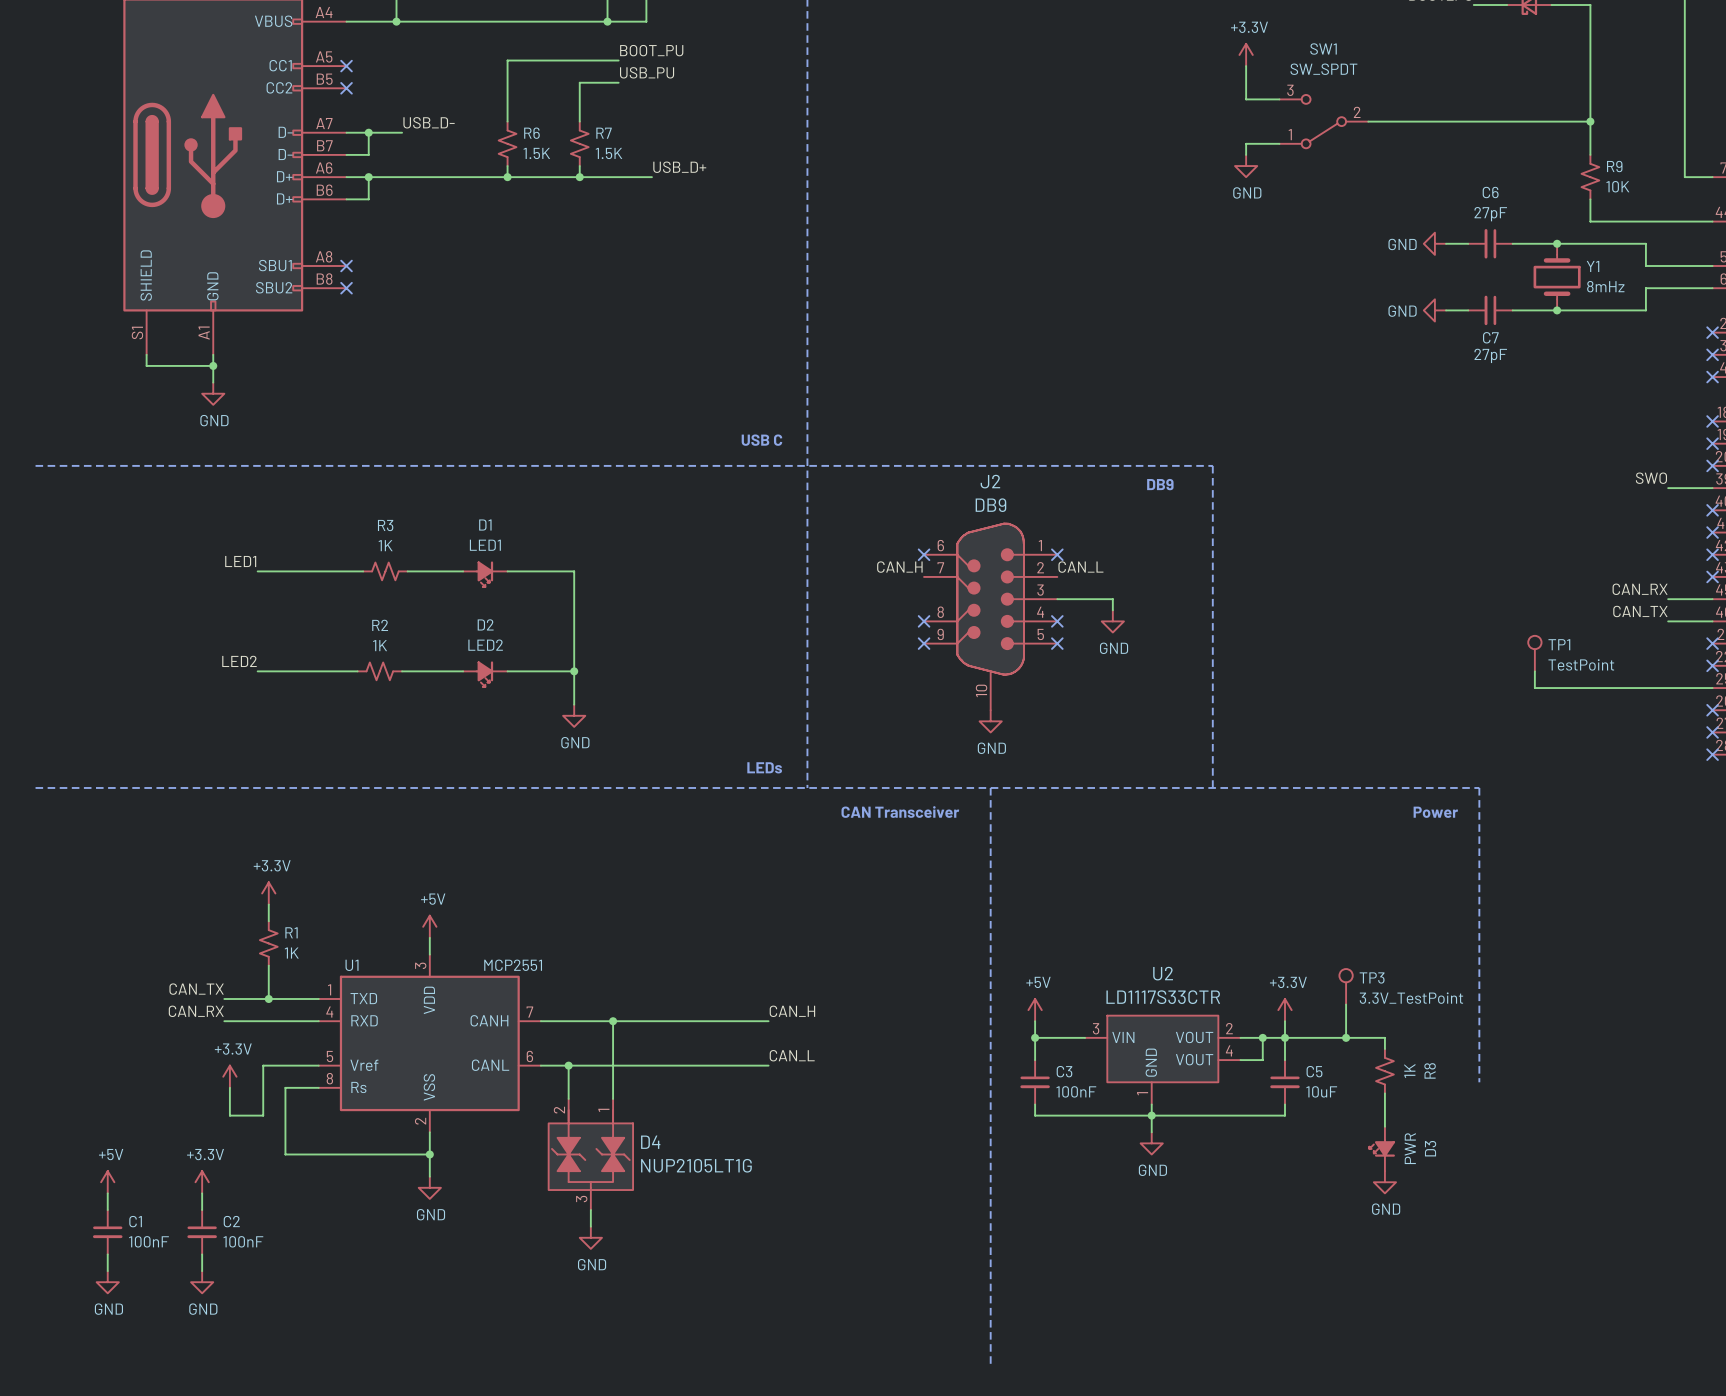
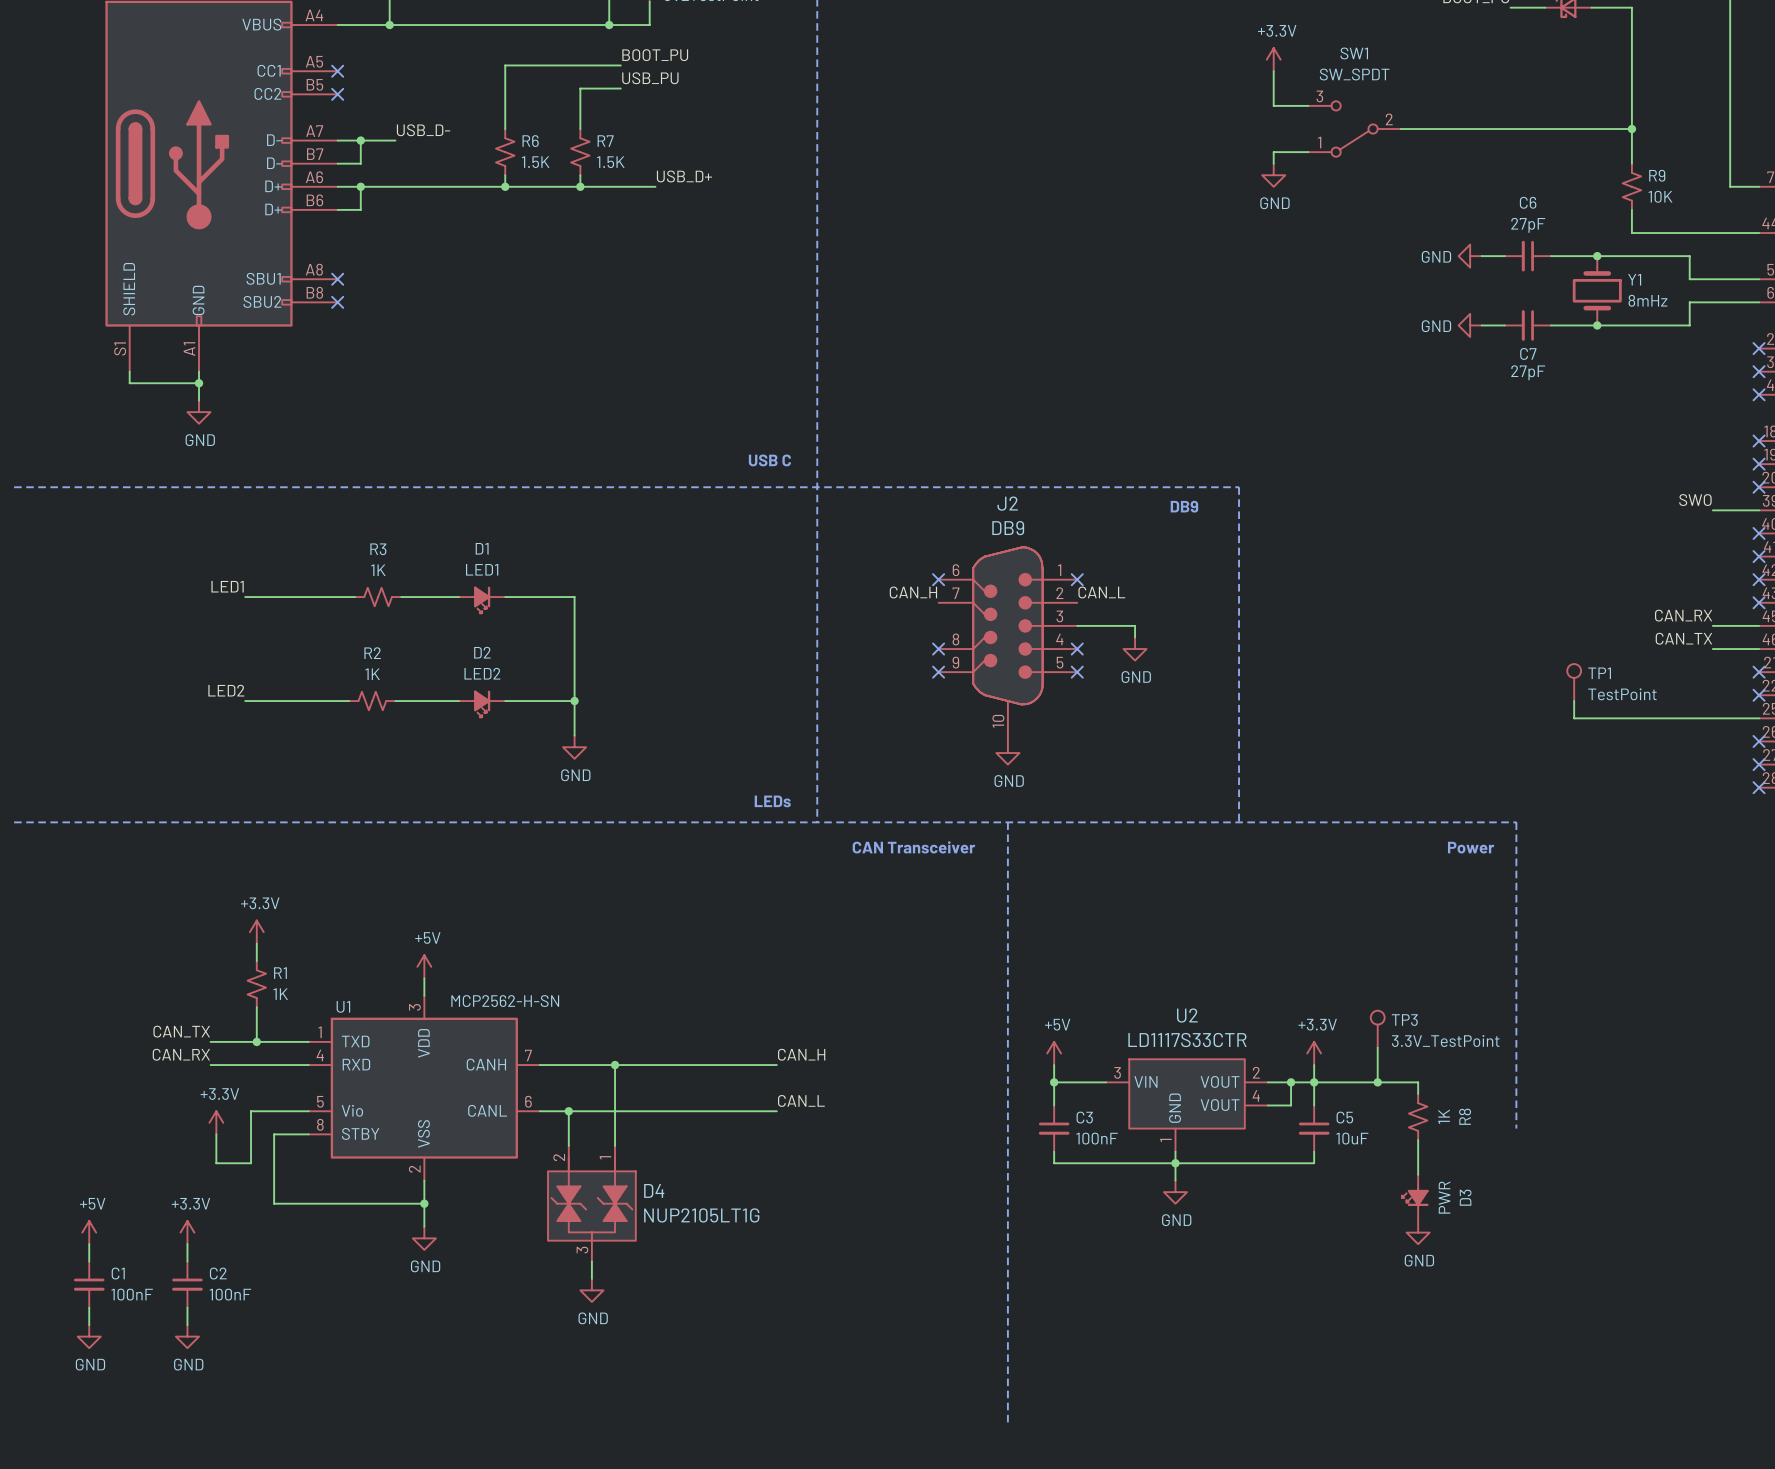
U1 value: MCP2551 (513, 965) -> MCP2562-H-SN (505, 1001)
U1 pin name: Vref (364, 1065) -> Vio (352, 1110)
U1 pin name: Rs (358, 1087) -> STBY (360, 1133)

